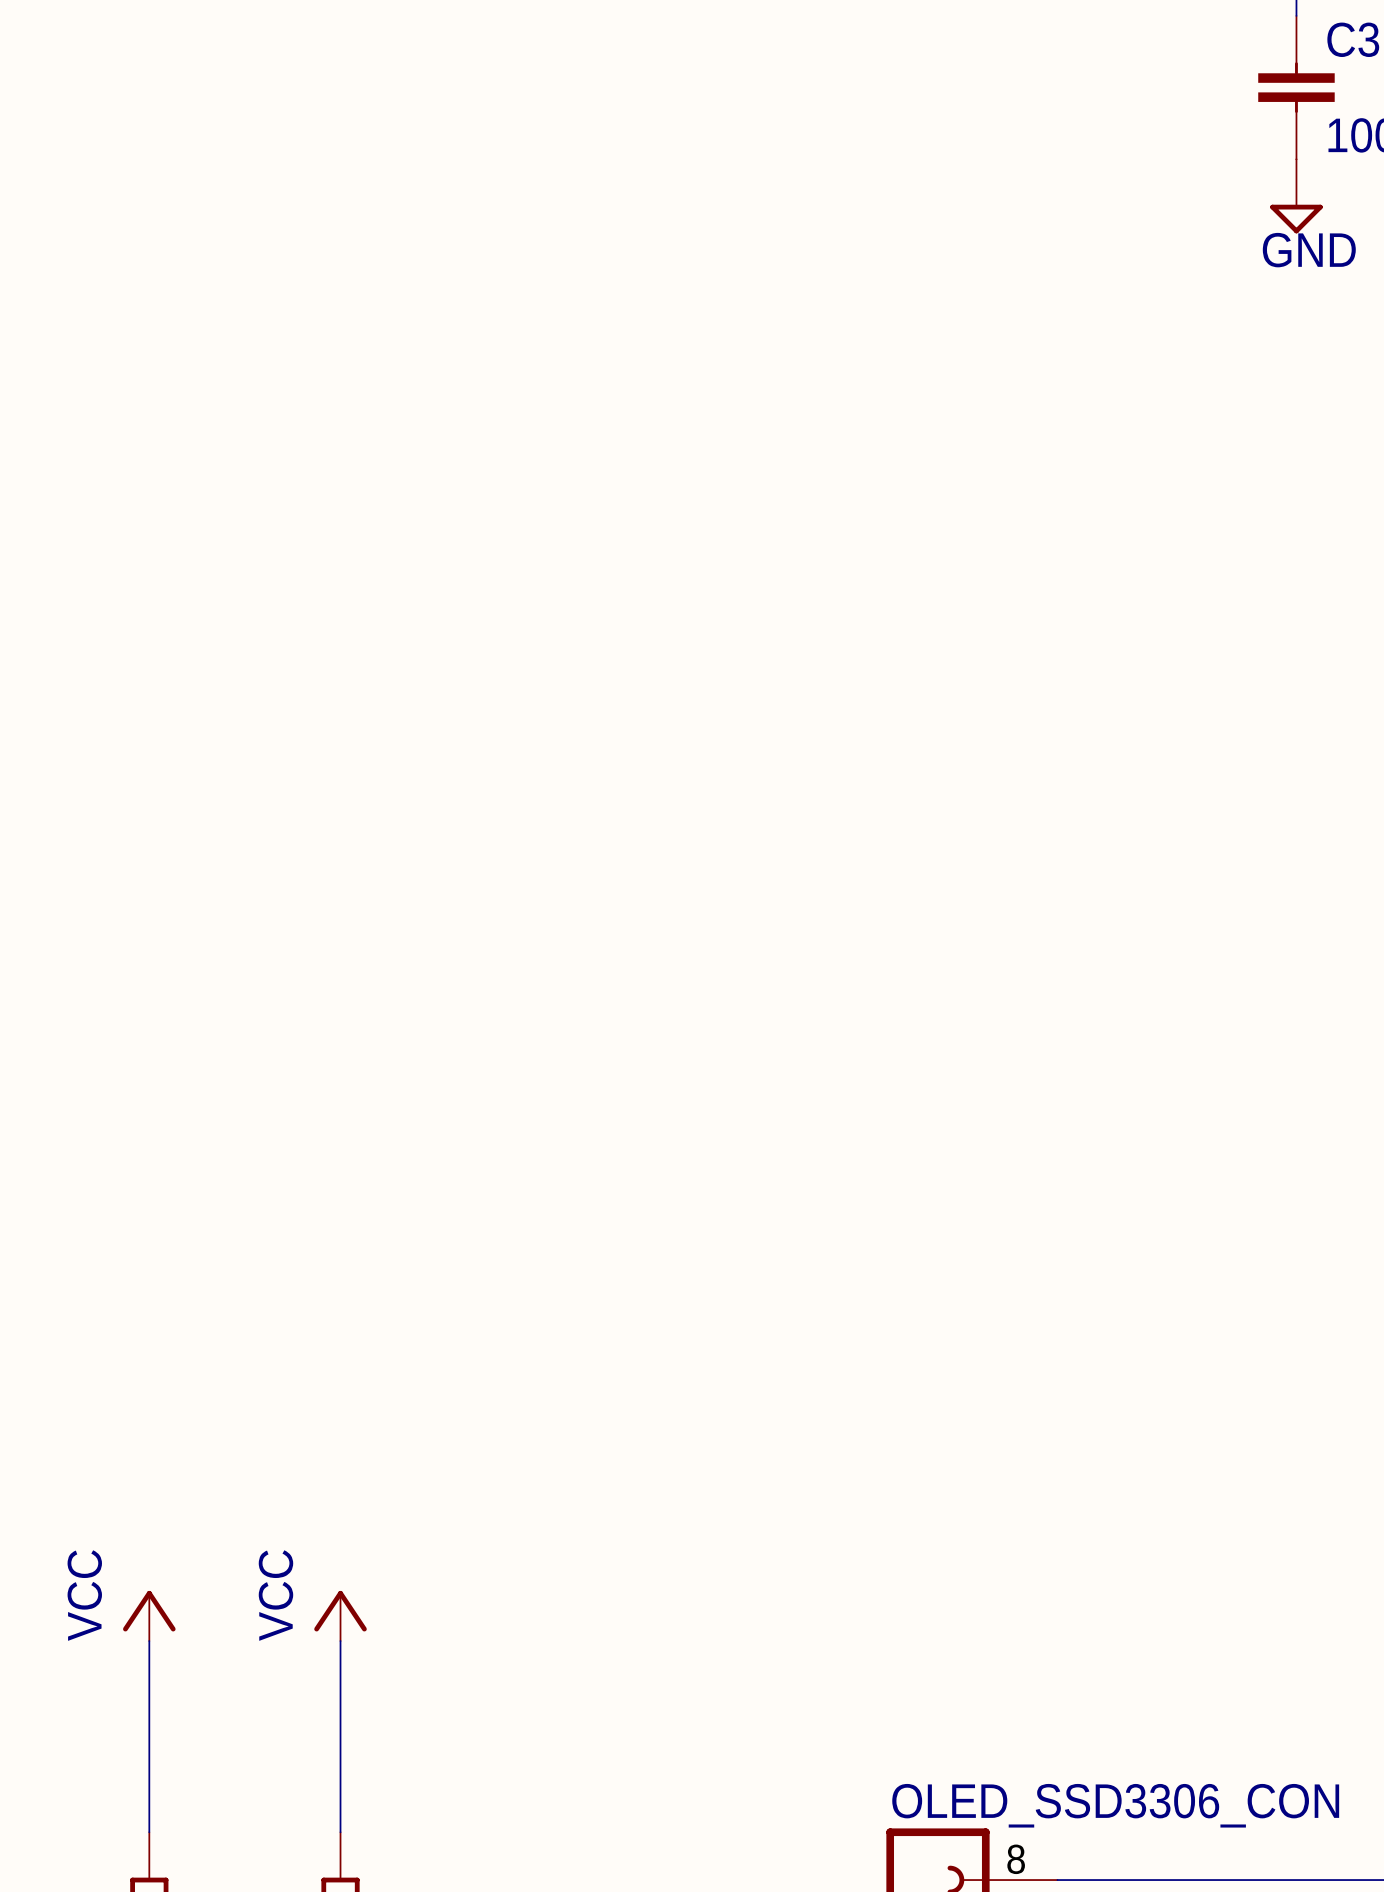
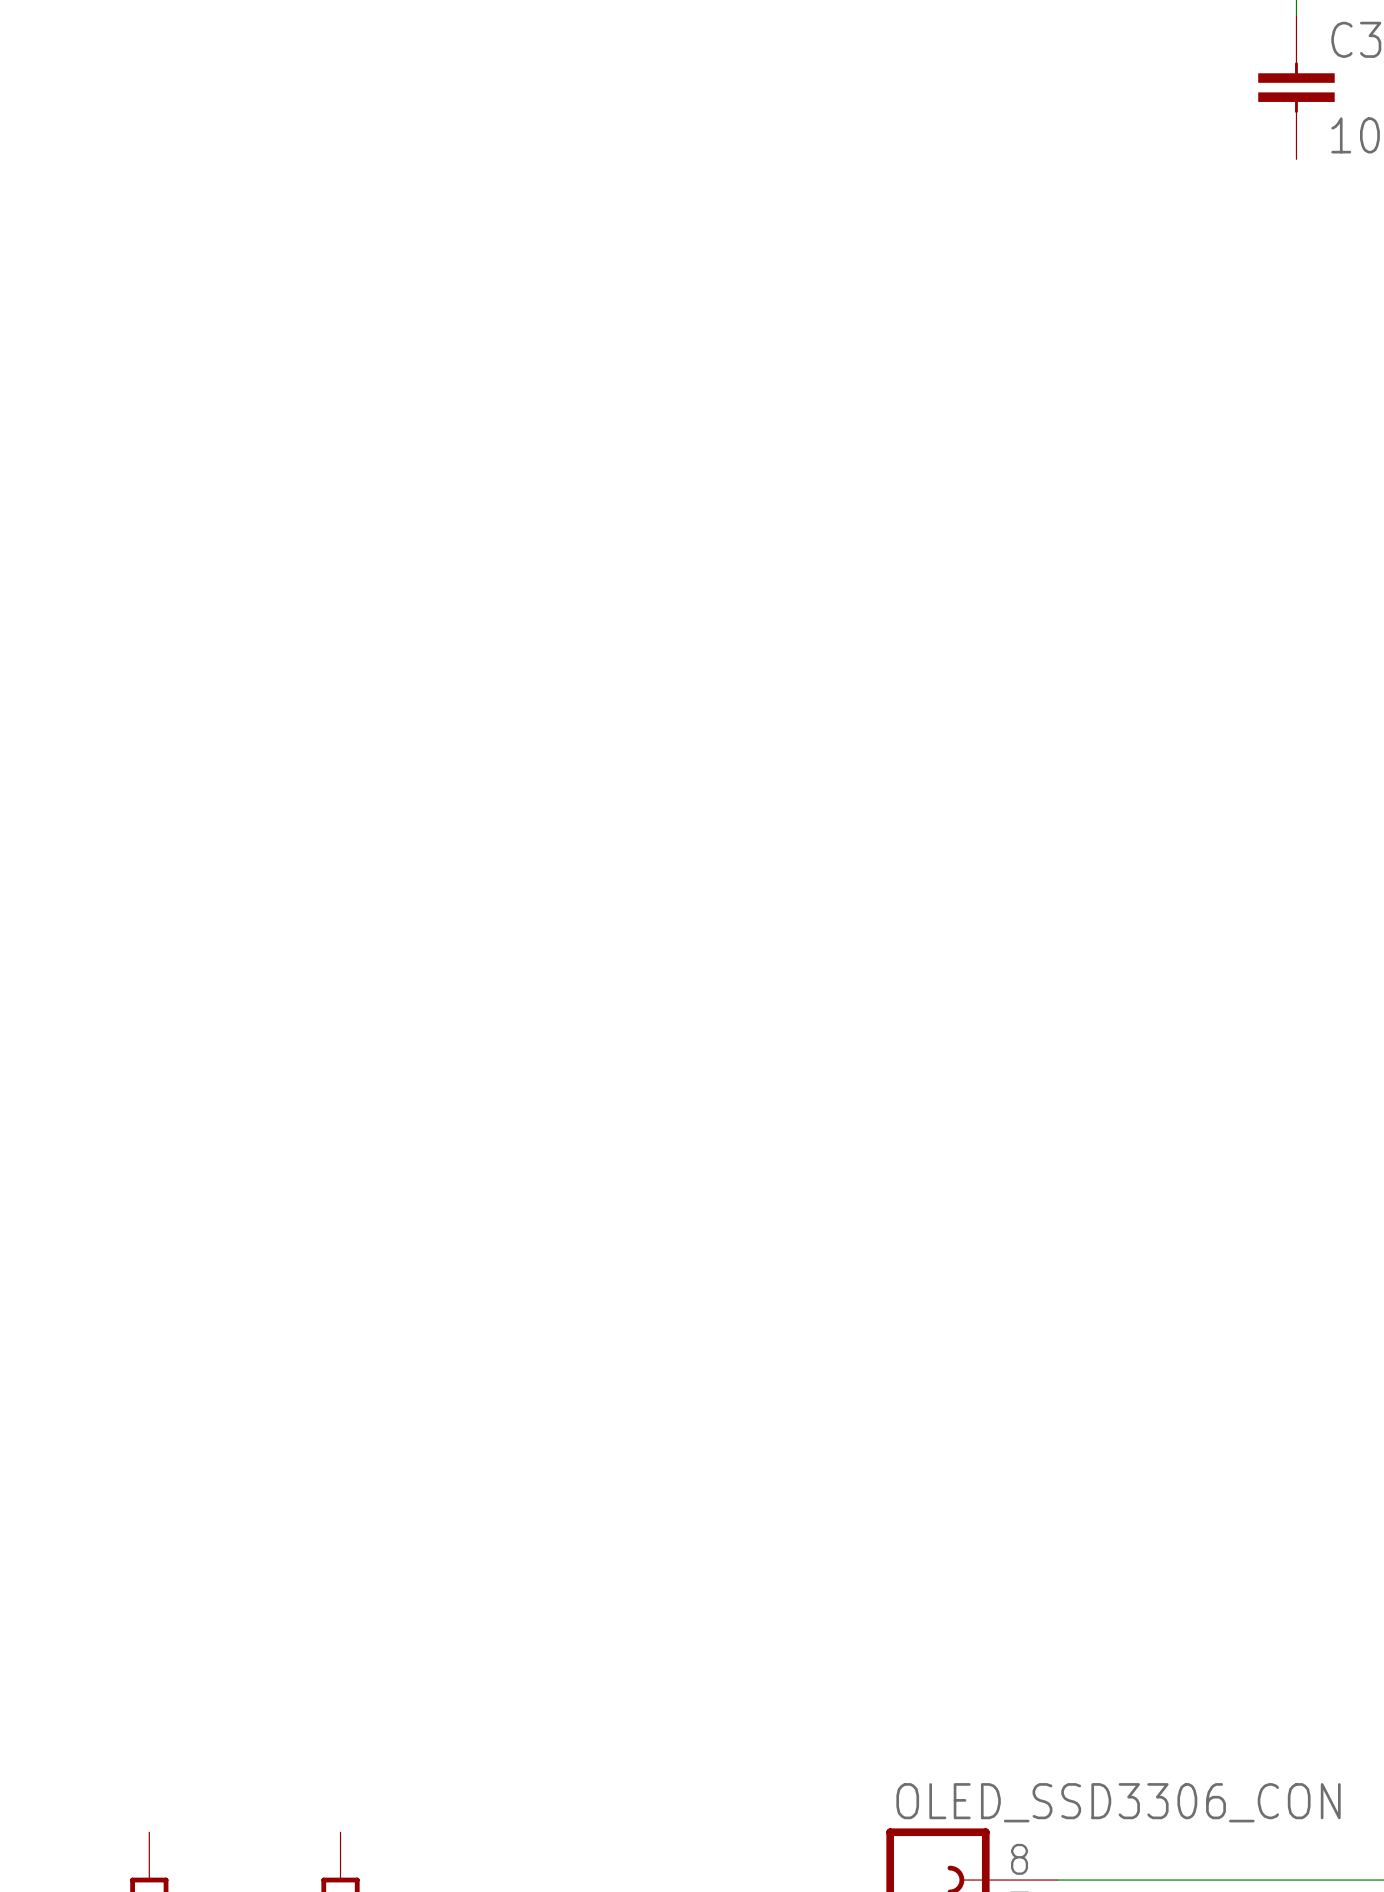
power symbol: GND (1296, 196) -> none
power symbol: VCC (149, 1615) -> none
power symbol: VCC (340, 1615) -> none
wire: (149, 1641) (149, 1832) -> none
wire: (340, 1641) (340, 1832) -> none

